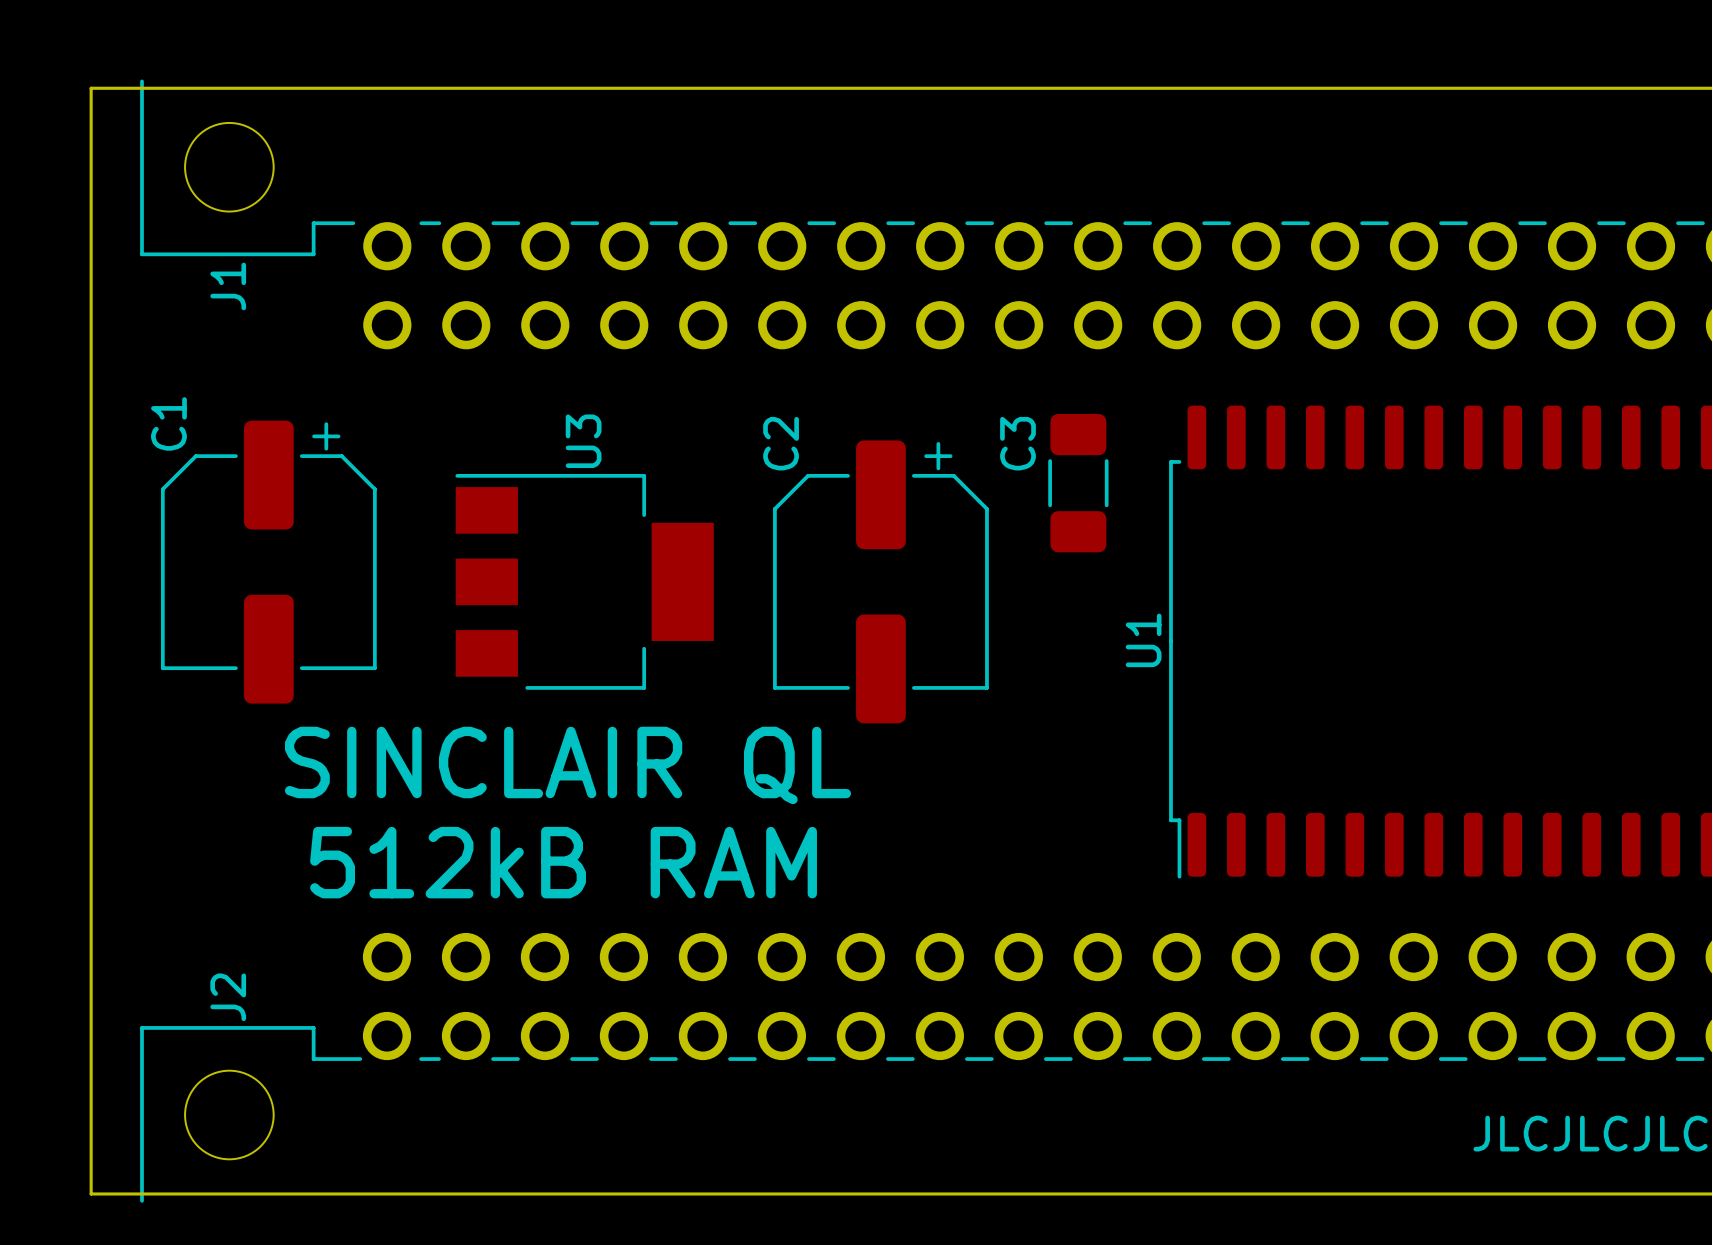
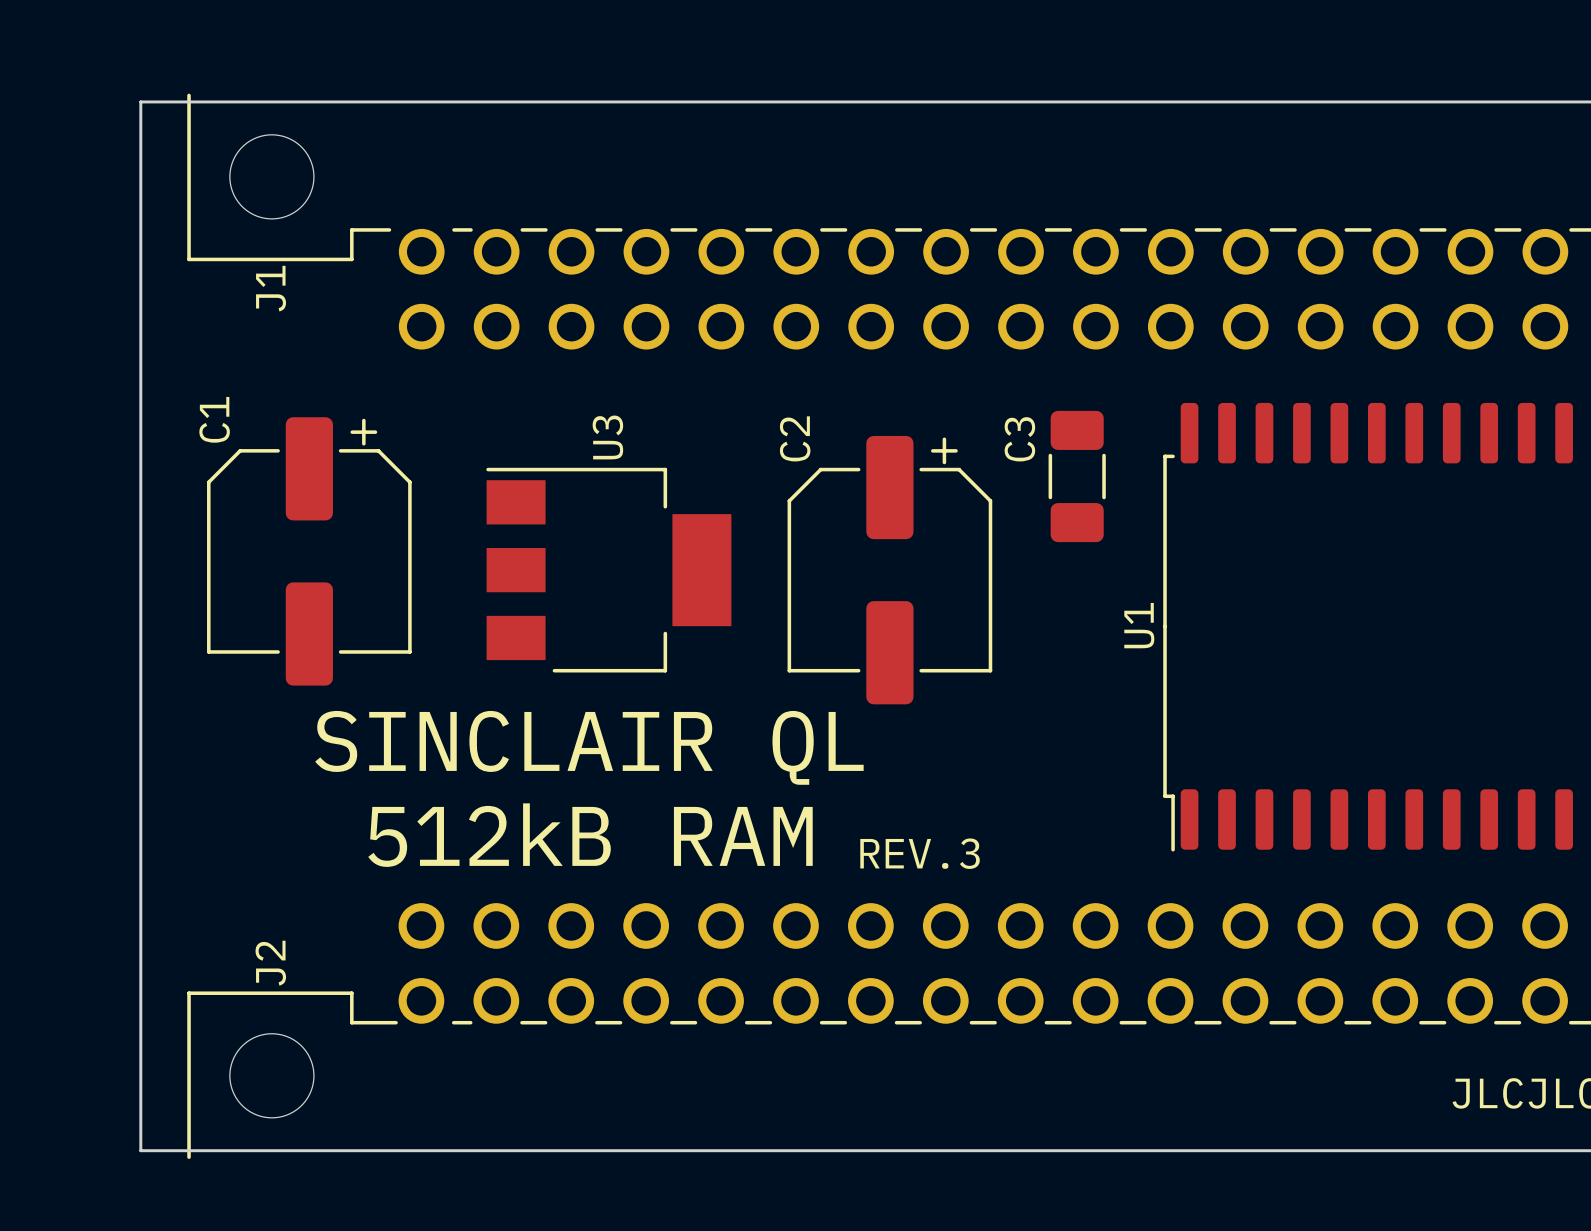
text: none -> REV.3 (920, 853)

